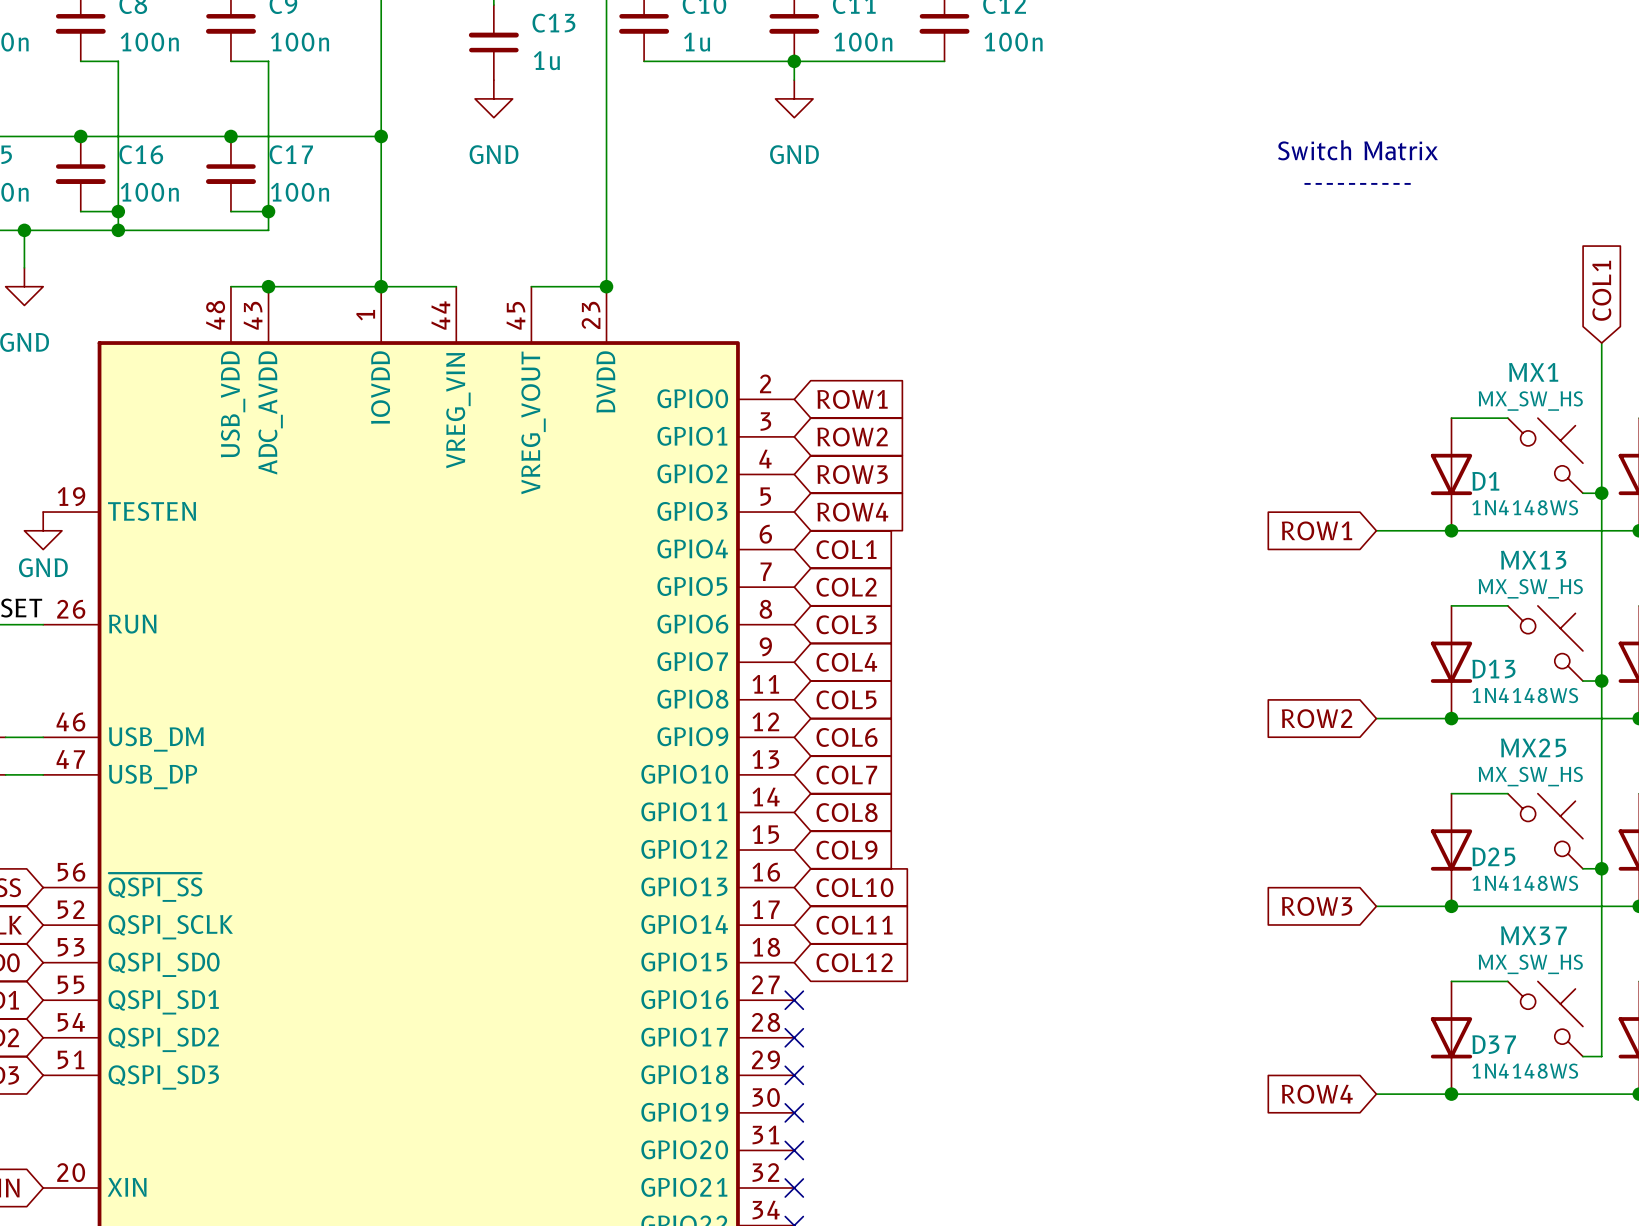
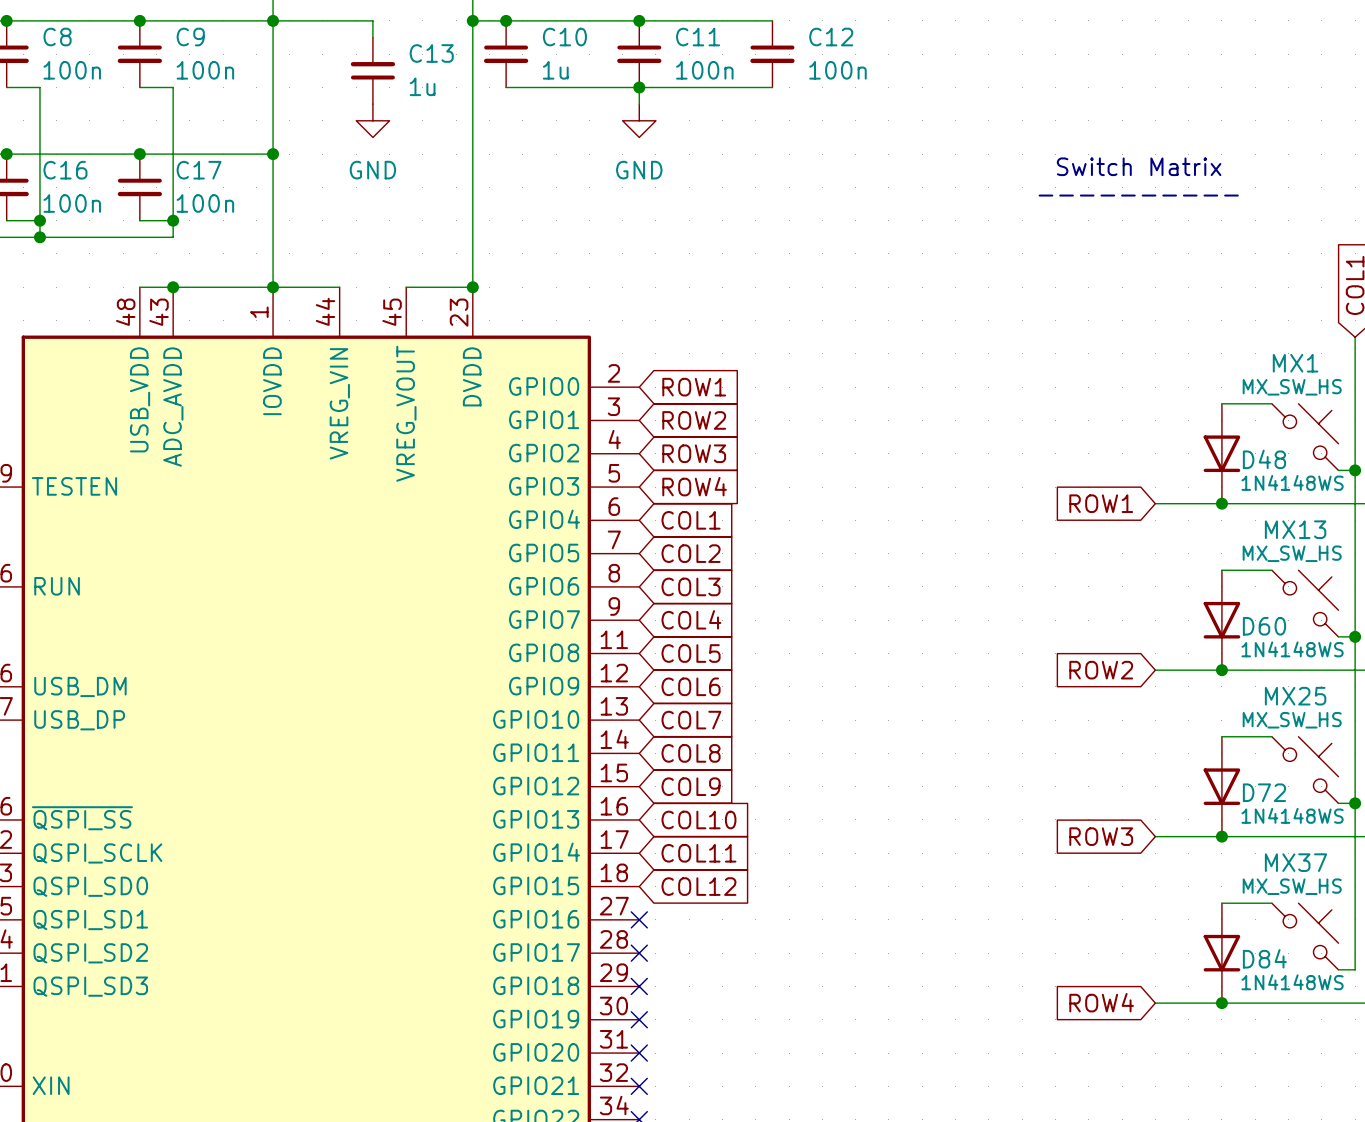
D1 name: D1 (1485, 481) -> D48 (1264, 459)
D13 name: D13 (1493, 669) -> D60 (1264, 626)
D25 name: D25 (1493, 856) -> D72 (1264, 792)
D37 name: D37 (1494, 1044) -> D84 (1264, 958)

